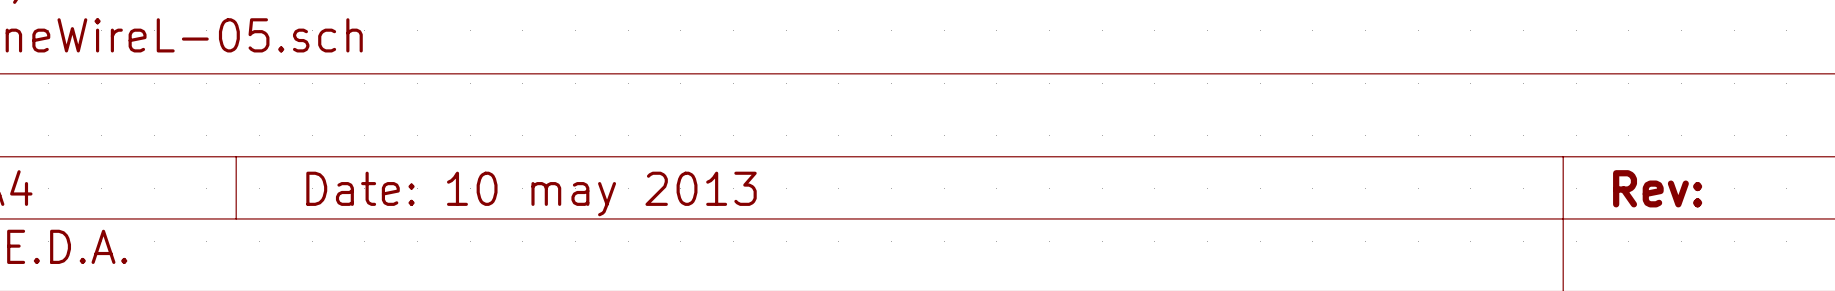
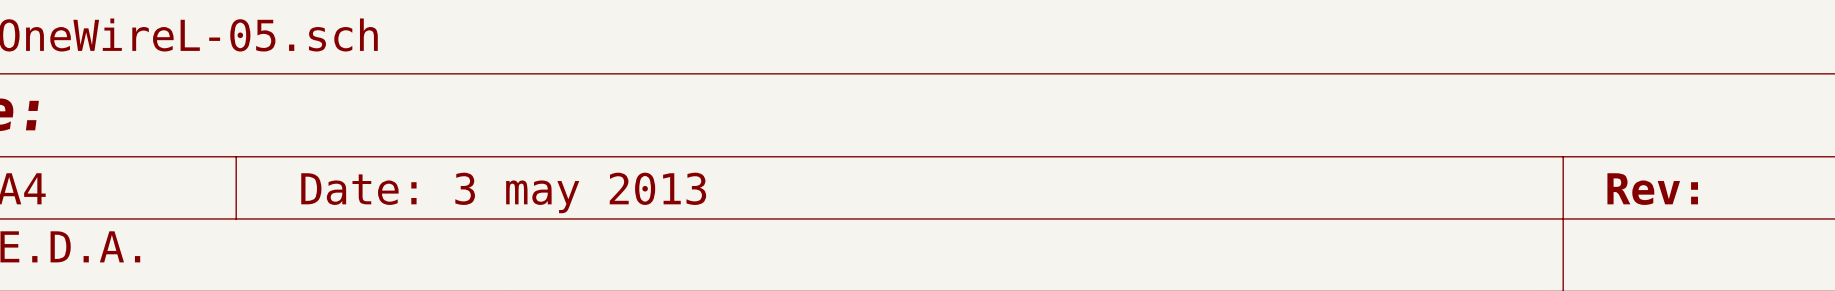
title block: Date: 10 may 2013 (531, 193) -> Date: 3 may 2013 (503, 192)

